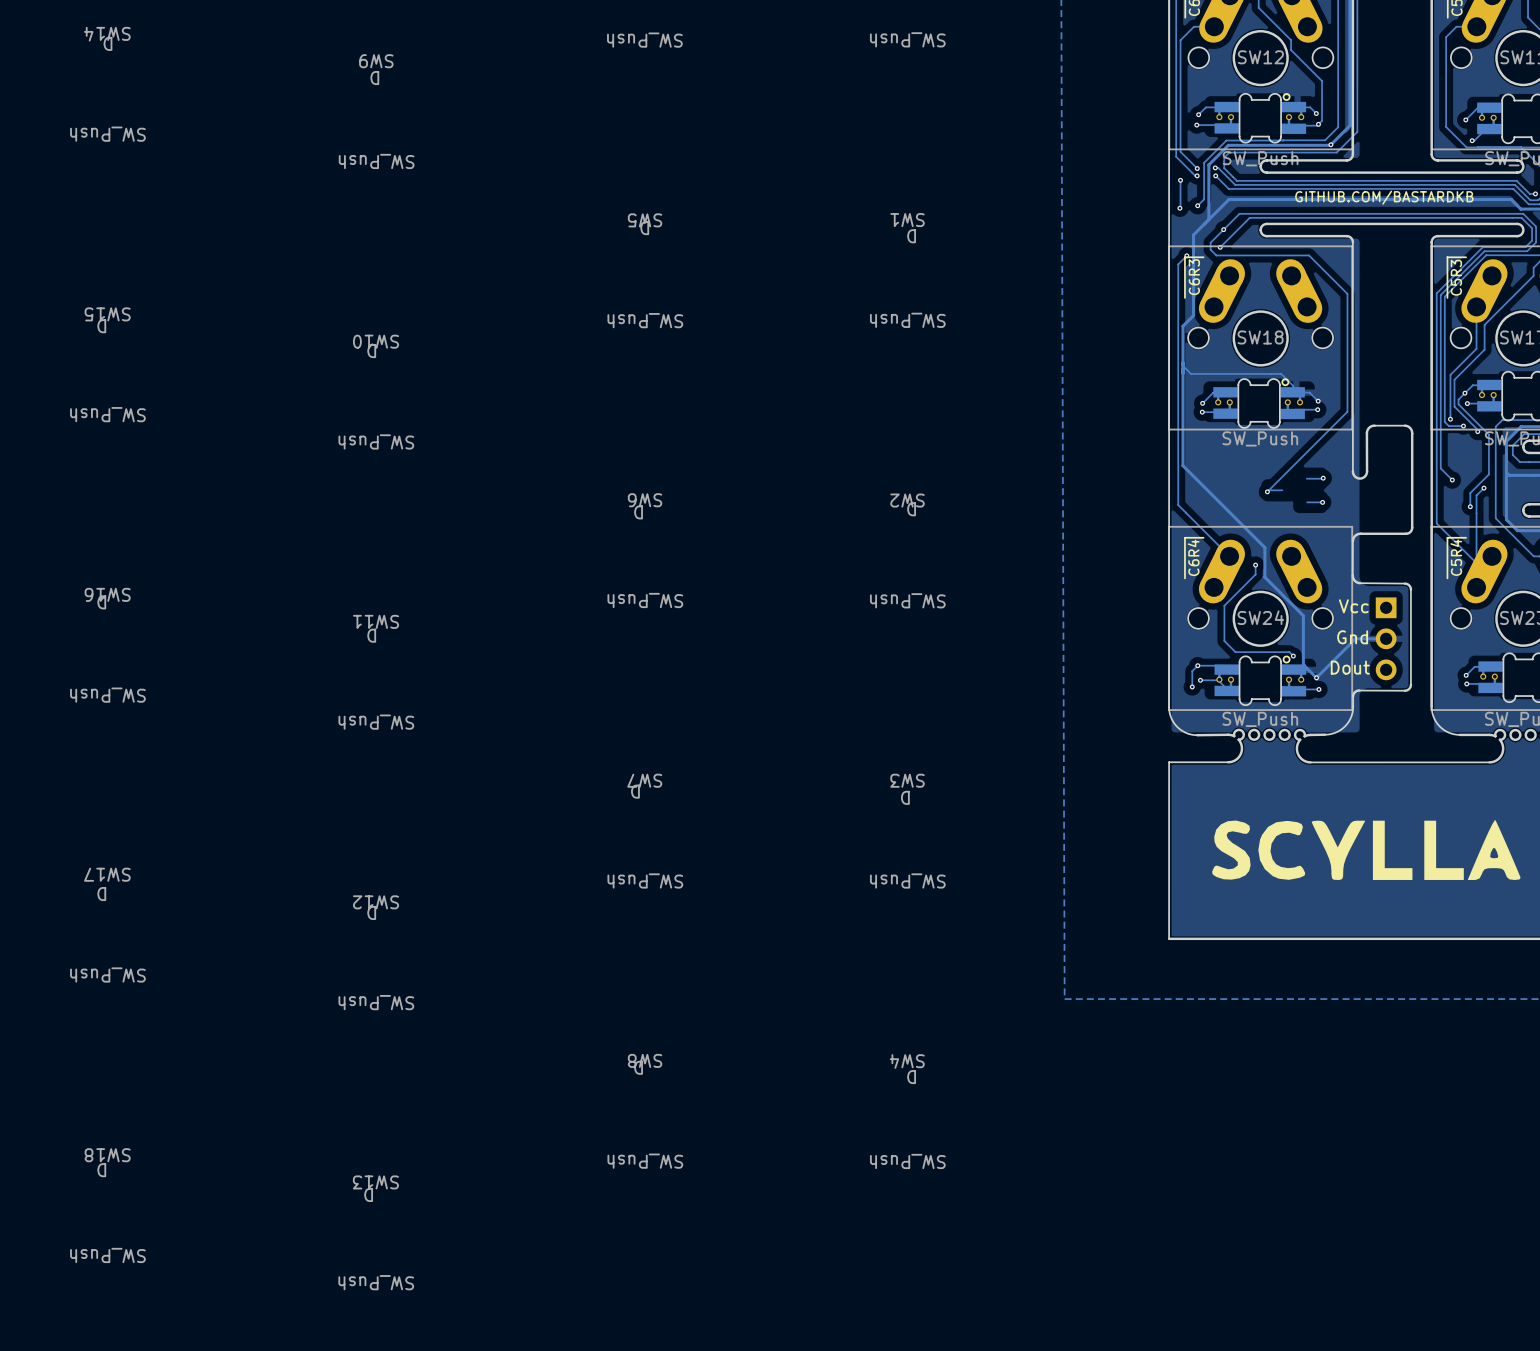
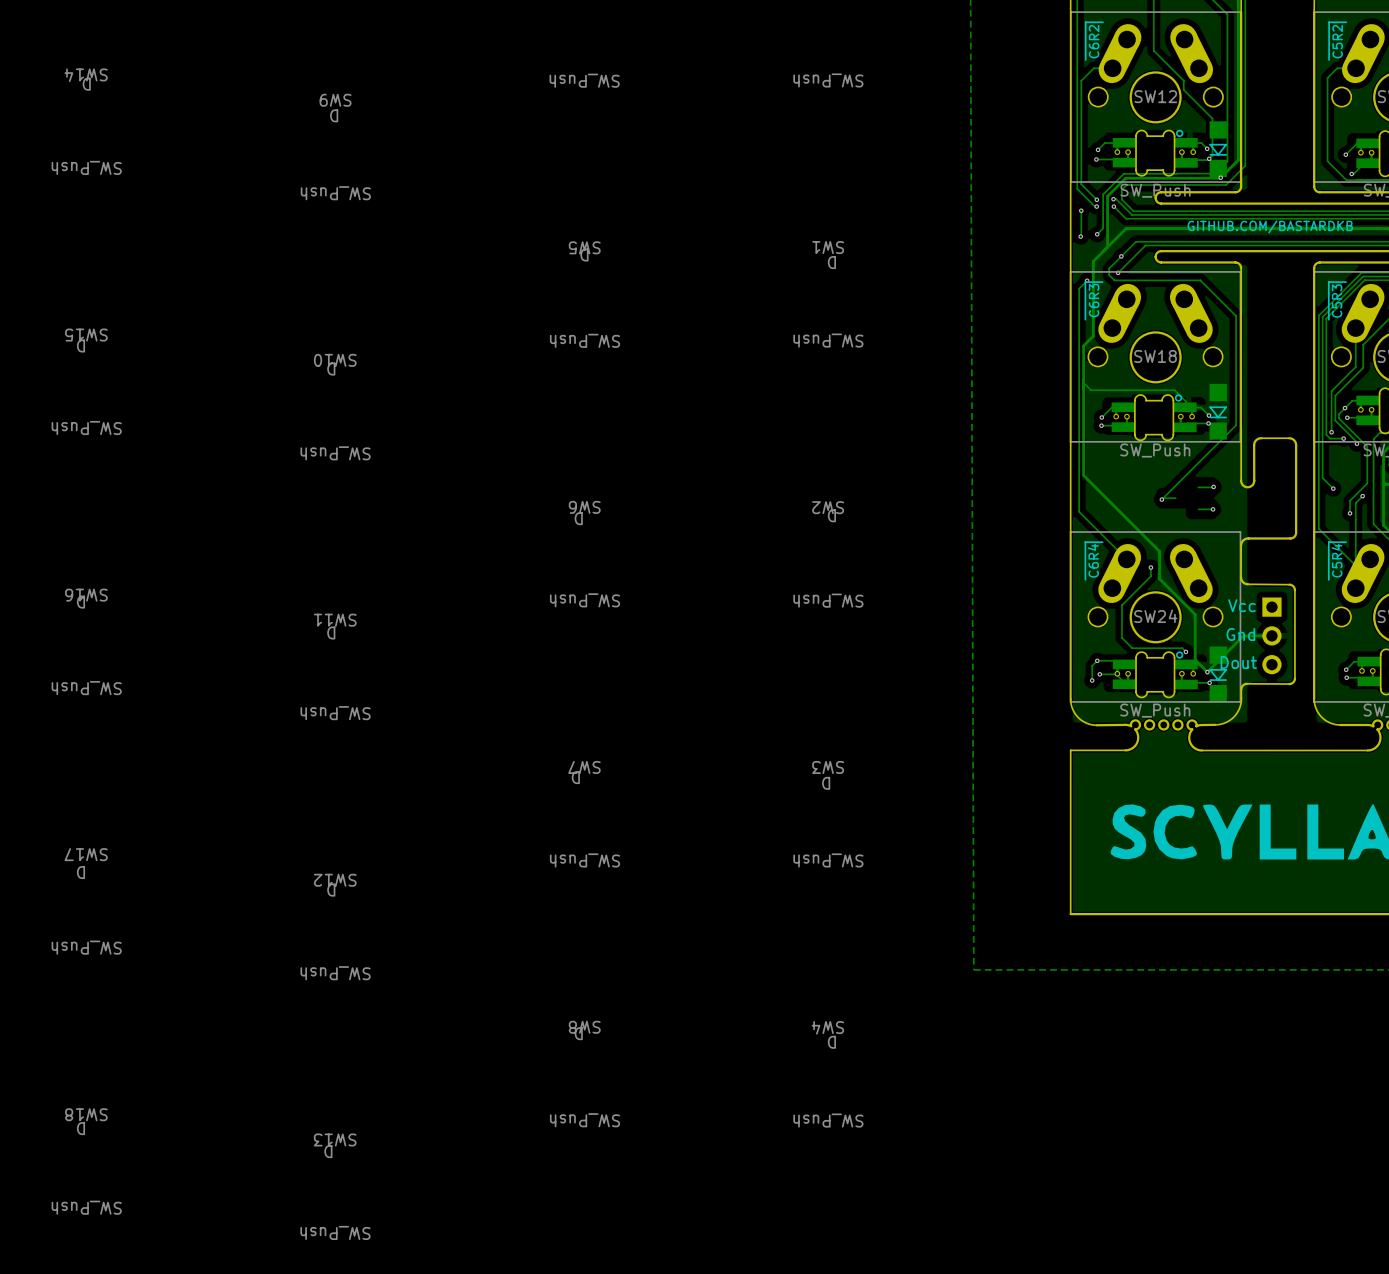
part: none -> (1218, 149)
part: none -> (1218, 411)
part: none -> (1218, 674)

